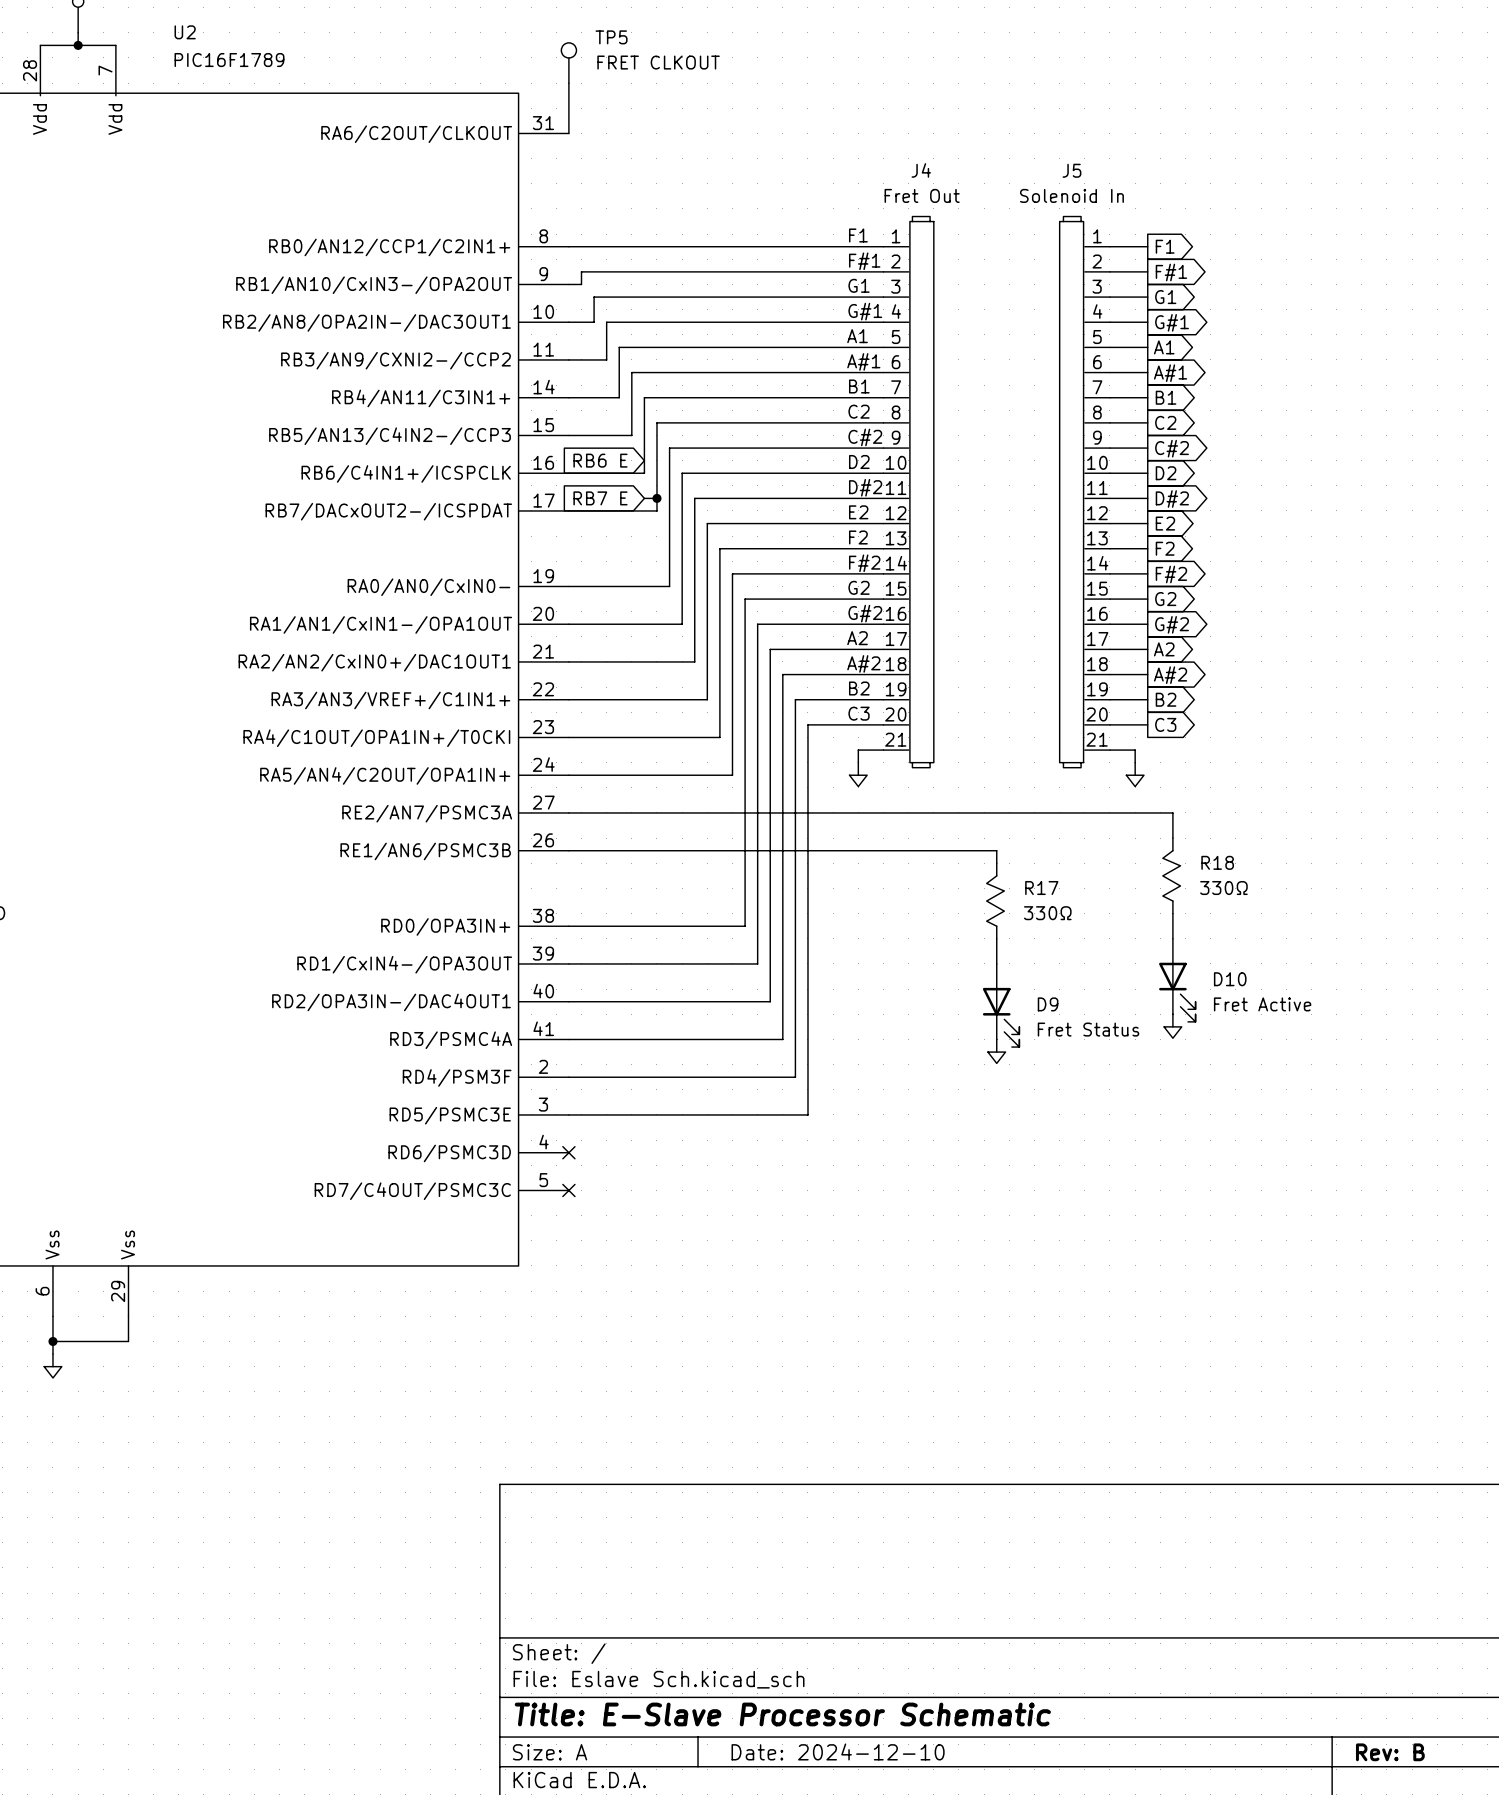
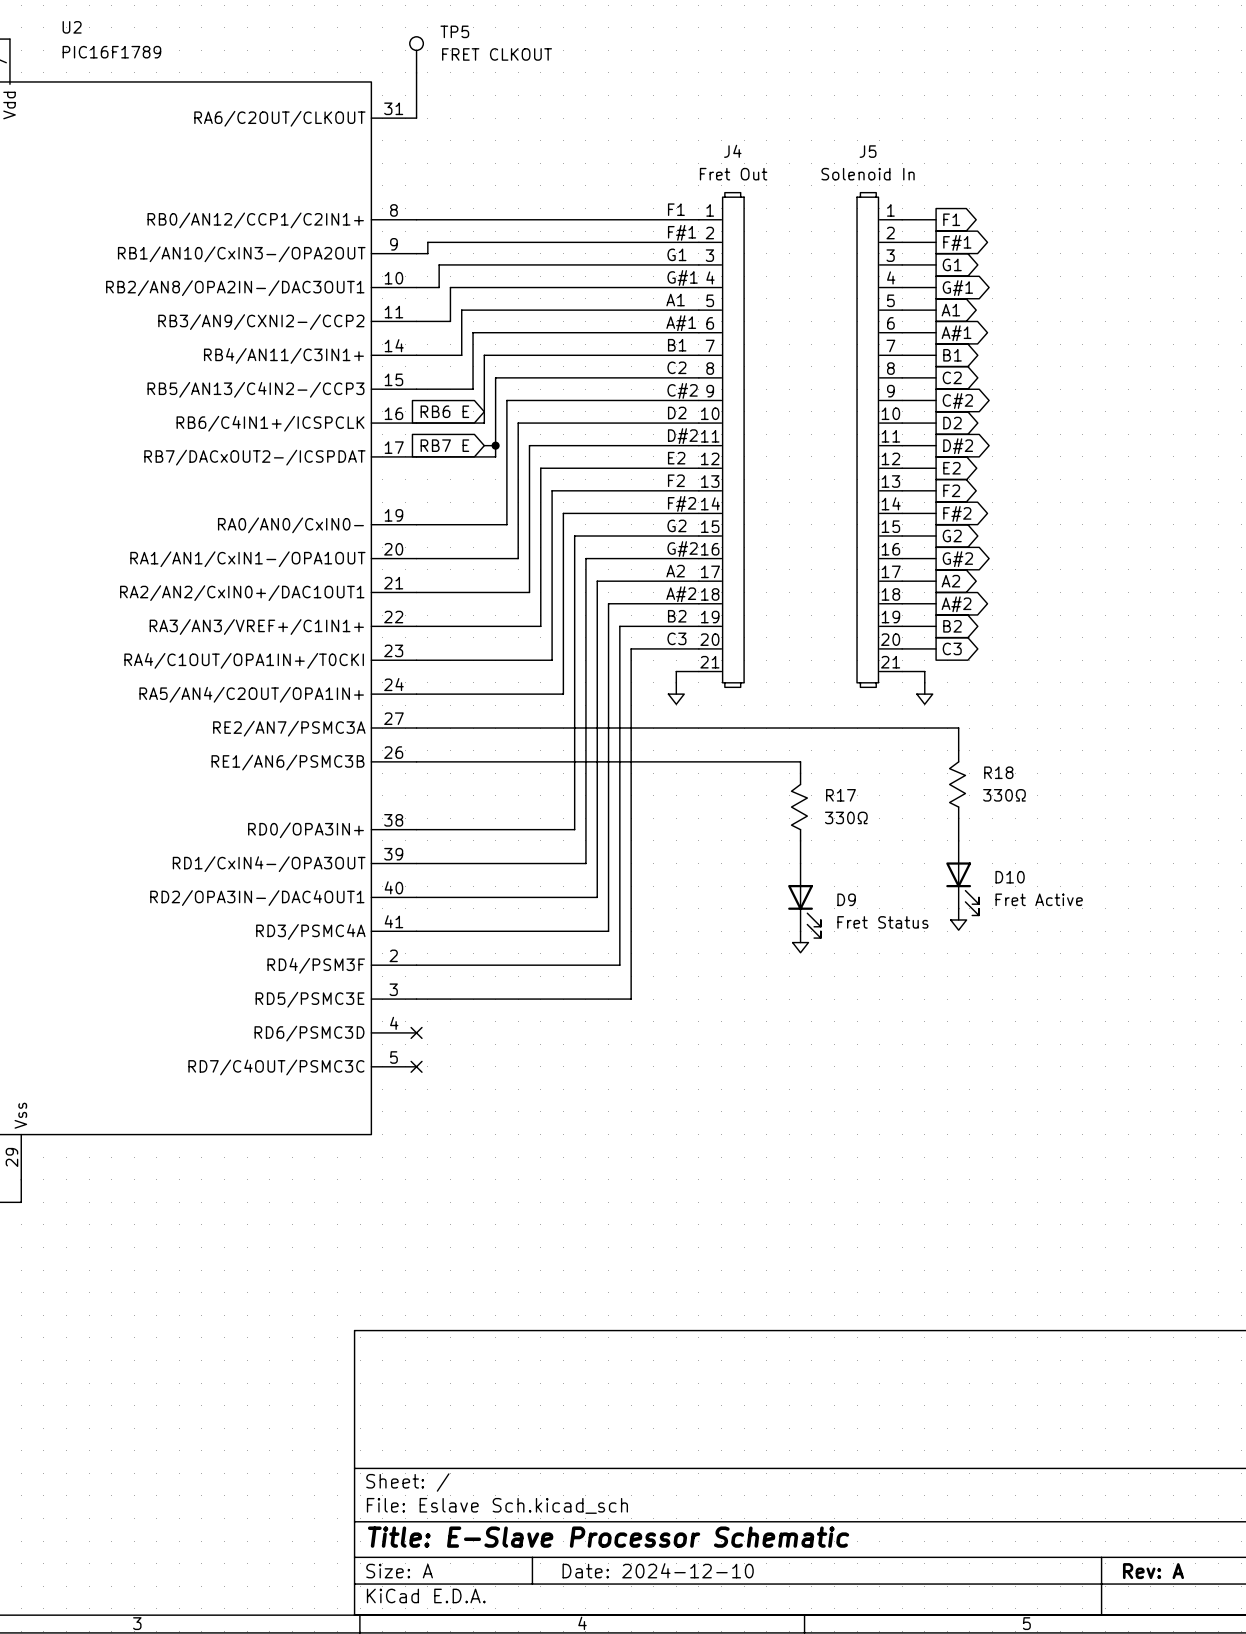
title block: Rev: B (1390, 1752) -> Rev: A (1153, 1571)

